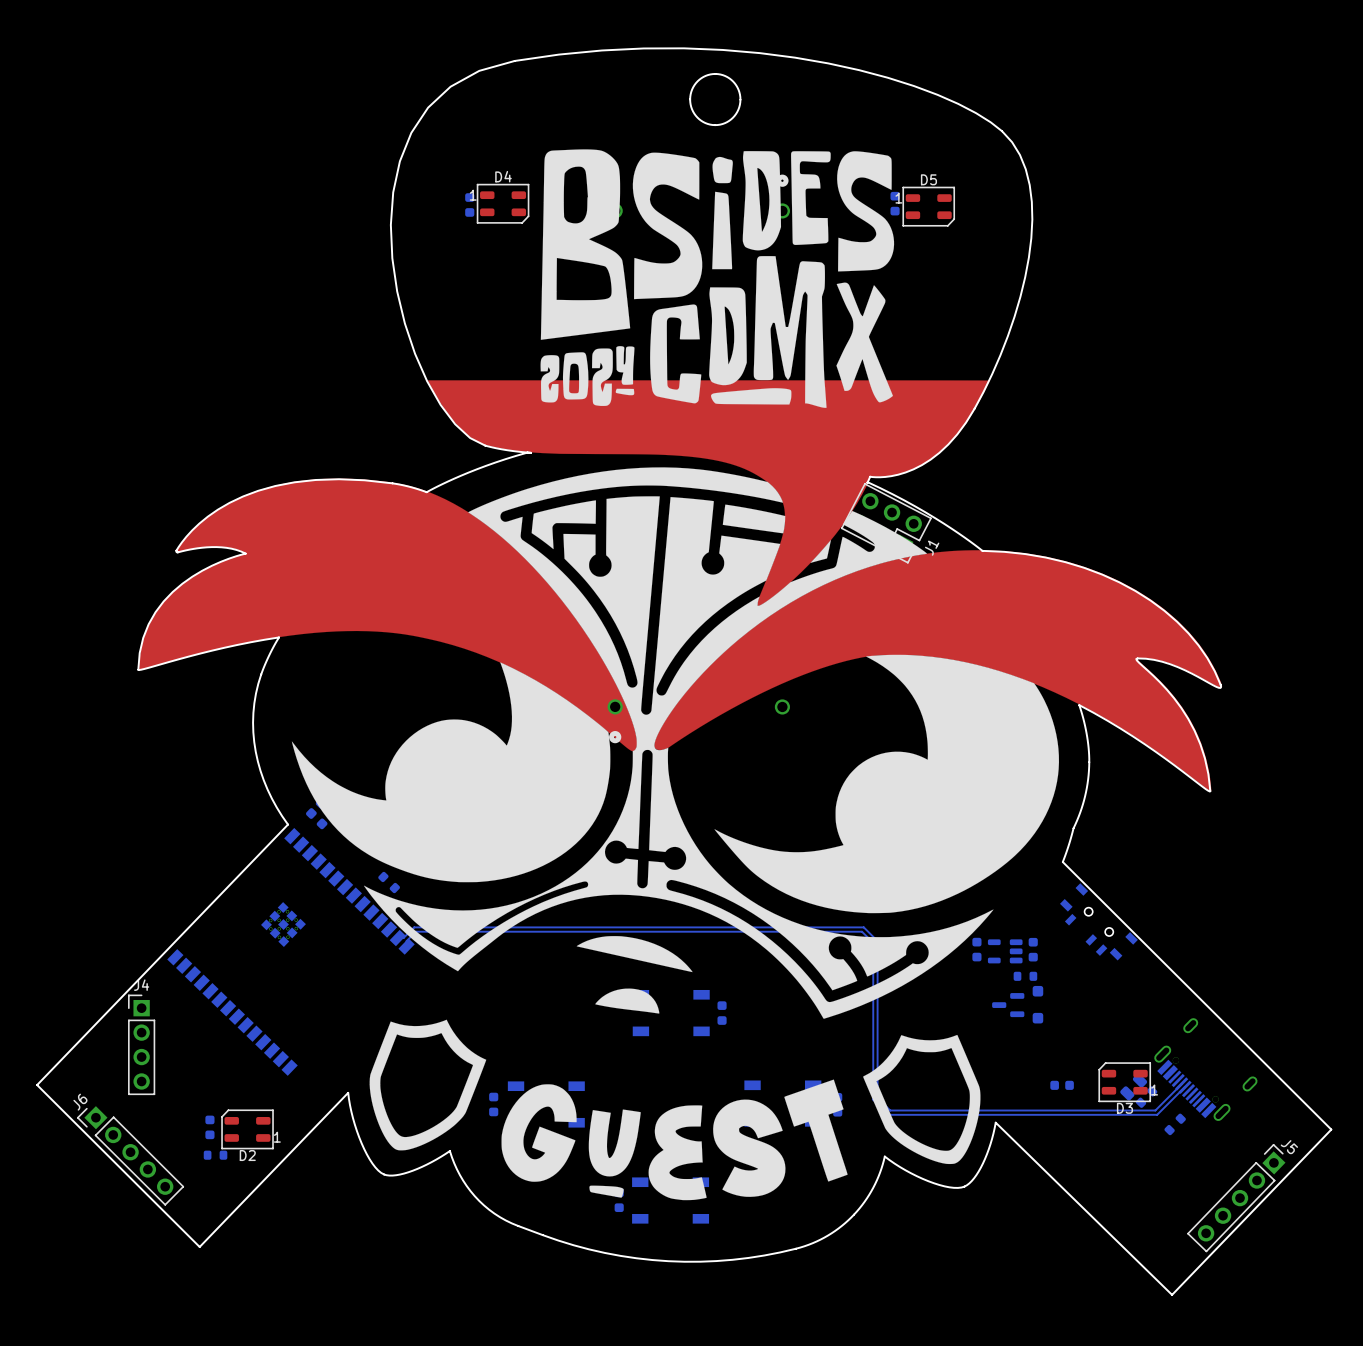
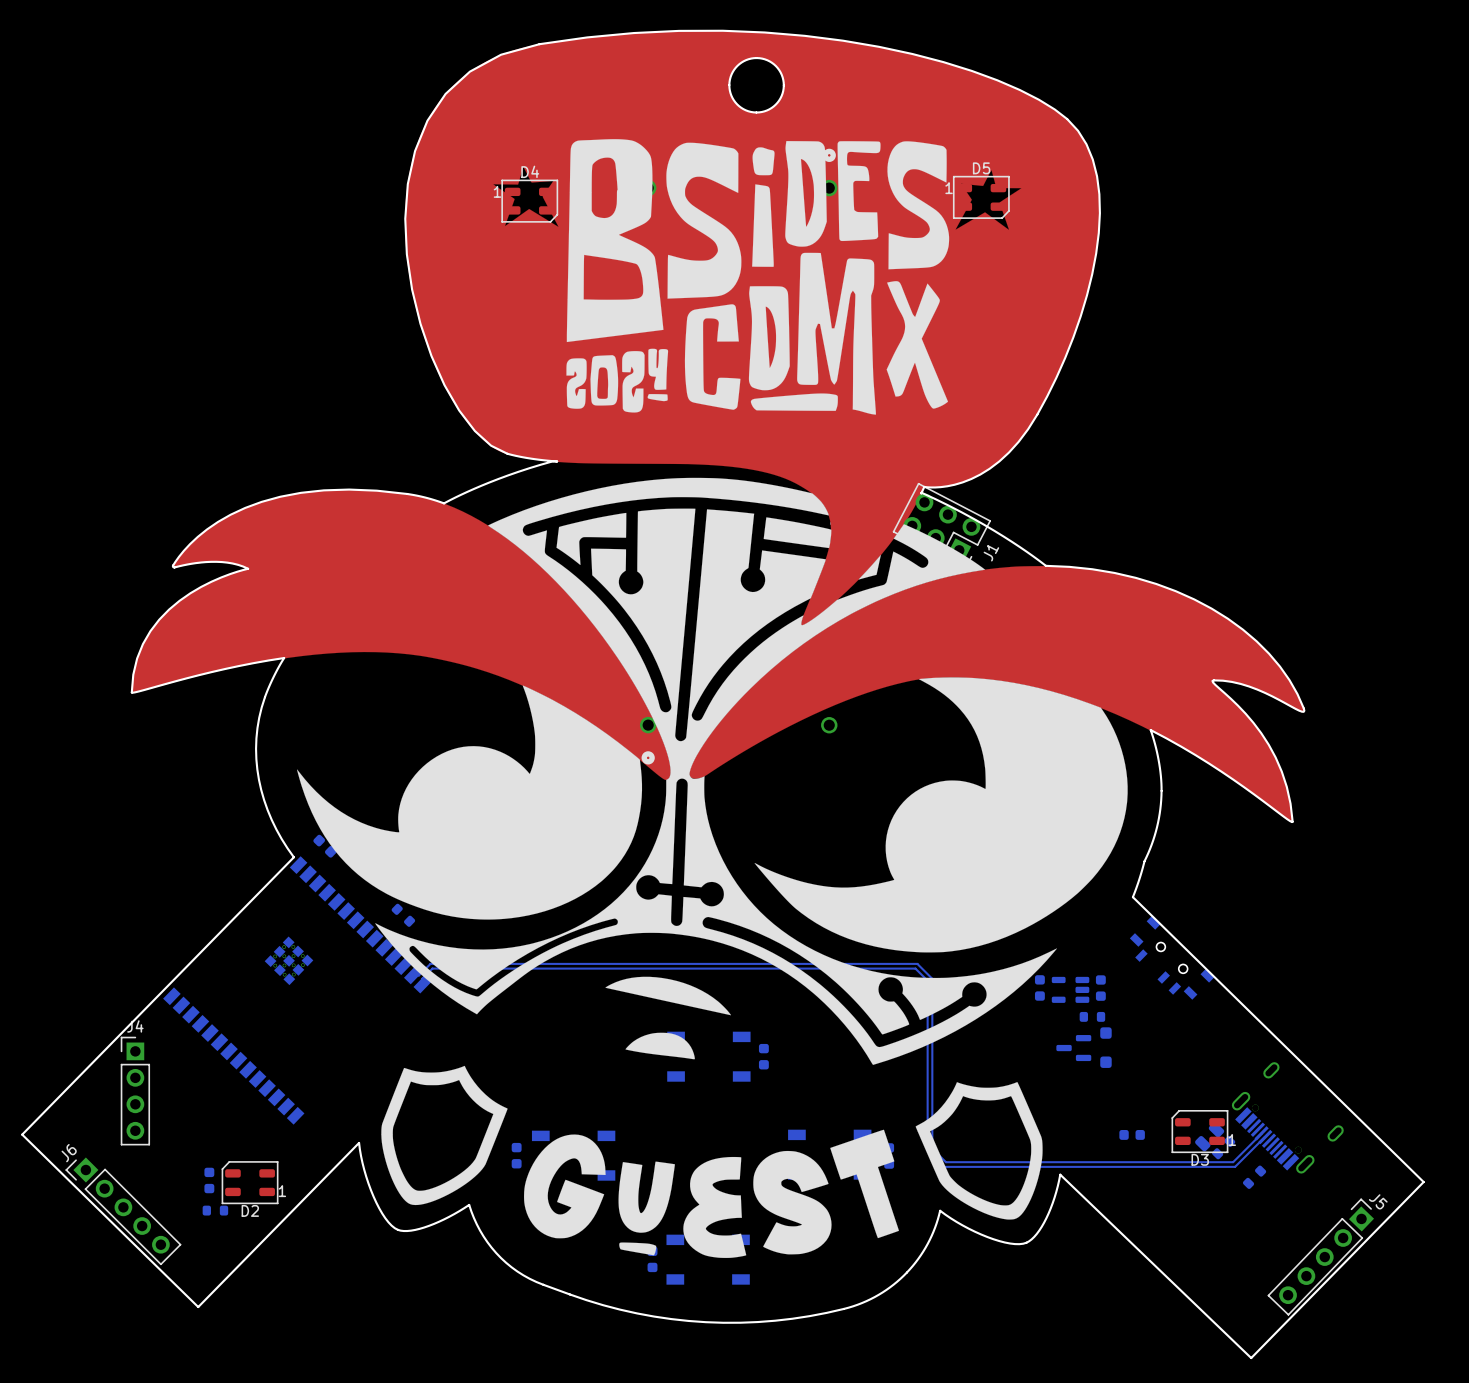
board edge: (514, 60) (479, 70) (450, 86) (428, 107) (411, 132) (399, 161) (393, 192) (390, 224) (392, 258) (397, 291) (404, 323) (415, 353) (440, 404) (455, 424) (470, 438) (490, 446) (531, 452) (476, 469) (426, 492) (392, 483) (339, 479) (315, 479) (275, 485) (243, 496) (217, 509) (199, 523) (181, 542) (176, 552) (216, 547) (231, 548) (245, 553) (202, 570) (182, 583) (163, 601) (148, 624) (143, 637) (138, 669) (224, 647) (279, 637) (266, 660) (258, 683) (254, 703) (253, 732) (255, 751) (263, 780) (271, 798) (288, 824) (37, 1085) (199, 1246) (348, 1092) (352, 1118) (361, 1143) (372, 1163) (384, 1174) (396, 1175) (412, 1170) (449, 1151) (459, 1175) (470, 1191) (489, 1209) (505, 1220) (558, 1240) (589, 1249) (620, 1255) (668, 1261) (716, 1261) (748, 1257) (796, 1248) (820, 1239) (841, 1225) (862, 1205) (876, 1180) (884, 1156) (905, 1170) (928, 1181) (949, 1187) (964, 1186) (974, 1178) (983, 1163) (995, 1122) (1172, 1294) (1331, 1129) (1062, 862) (1082, 804) (1088, 775) (1087, 740) (1079, 705) (1133, 736) (1209, 791) (1204, 758) (1188, 718) (1166, 689) (1136, 658) (1162, 661) (1184, 670) (1216, 686) (1220, 687) (1220, 684) (1207, 658) (1188, 633) (1164, 610) (1135, 591) (1102, 574) (1065, 562) (1025, 554) (982, 550) (925, 512) (867, 482) (870, 476) (891, 476) (913, 469) (939, 452) (966, 422) (992, 374) (1014, 316) (1028, 257) (1031, 201) (1025, 169) (1019, 154) (1002, 131) (976, 113) (958, 103) (887, 77) (828, 63) (759, 53) (684, 48) (601, 50) (514, 60) -> (539, 44) (501, 54) (469, 71) (445, 93) (427, 120) (415, 151) (407, 184) (405, 218) (406, 254) (412, 289) (420, 323) (431, 355) (444, 385) (459, 410) (474, 431) (491, 445) (513, 455) (557, 461) (541, 464) (498, 479) (444, 503) (407, 493) (349, 489) (323, 490) (280, 496) (245, 507) (217, 521) (197, 536) (179, 556) (173, 567) (216, 561) (232, 563) (248, 568) (221, 577) (201, 586) (179, 600) (159, 619) (142, 644) (137, 658) (131, 692) (225, 669) (284, 658) (271, 682) (261, 707) (257, 728) (256, 759) (258, 779) (267, 810) (276, 829) (293, 857) (22, 1134) (198, 1307) (359, 1142) (364, 1169) (373, 1196) (385, 1218) (397, 1229) (411, 1230) (429, 1225) (469, 1204) (480, 1230) (491, 1247) (511, 1267) (529, 1278) (586, 1300) (620, 1309) (654, 1316) (705, 1322) (757, 1322) (792, 1318) (844, 1308) (870, 1299) (893, 1284) (915, 1262) (931, 1235) (940, 1210) (962, 1225) (987, 1237) (1010, 1243) (1026, 1242) (1036, 1233) (1046, 1218) (1054, 1197) (1060, 1174) (1251, 1358) (1423, 1182) (1132, 897) (1154, 835) (1160, 804) (1159, 767) (1150, 730) (1209, 763) (1292, 822) (1286, 786) (1268, 744) (1245, 713) (1212, 680) (1240, 683) (1265, 692) (1299, 710) (1303, 711) (1303, 708) (1289, 680) (1269, 653) (1242, 629) (1211, 608) (1175, 591) (1135, 577) (1092, 569) (1045, 565) (984, 524) (921, 493) (924, 486) (947, 486) (971, 479) (999, 461) (1028, 429) (1056, 377) (1080, 316) (1096, 253) (1099, 213) (1099, 194) (1092, 159) (1086, 144) (1067, 119) (1038, 99) (1019, 89) (943, 62) (878, 46) (804, 35) (722, 30) (633, 33) (539, 44)
drawing: none -> [131, 30, 1305, 1258]
board edge: (715, 73) (705, 75) (697, 81) (692, 89) (690, 99) (692, 109) (697, 117) (705, 123) (715, 125) (724, 123) (732, 117) (738, 109) (740, 99) (738, 89) (733, 81) (725, 76) (715, 73) -> (756, 58) (746, 60) (737, 65) (731, 74) (729, 85) (731, 95) (737, 104) (745, 110) (756, 112) (767, 110) (775, 104) (781, 96) (783, 85) (781, 74) (775, 66) (767, 60) (756, 58)
drawing: [139, 149, 1223, 1201] -> none
D4 position: (503, 203) -> (529, 201)
D5 position: (928, 206) -> (981, 197)

